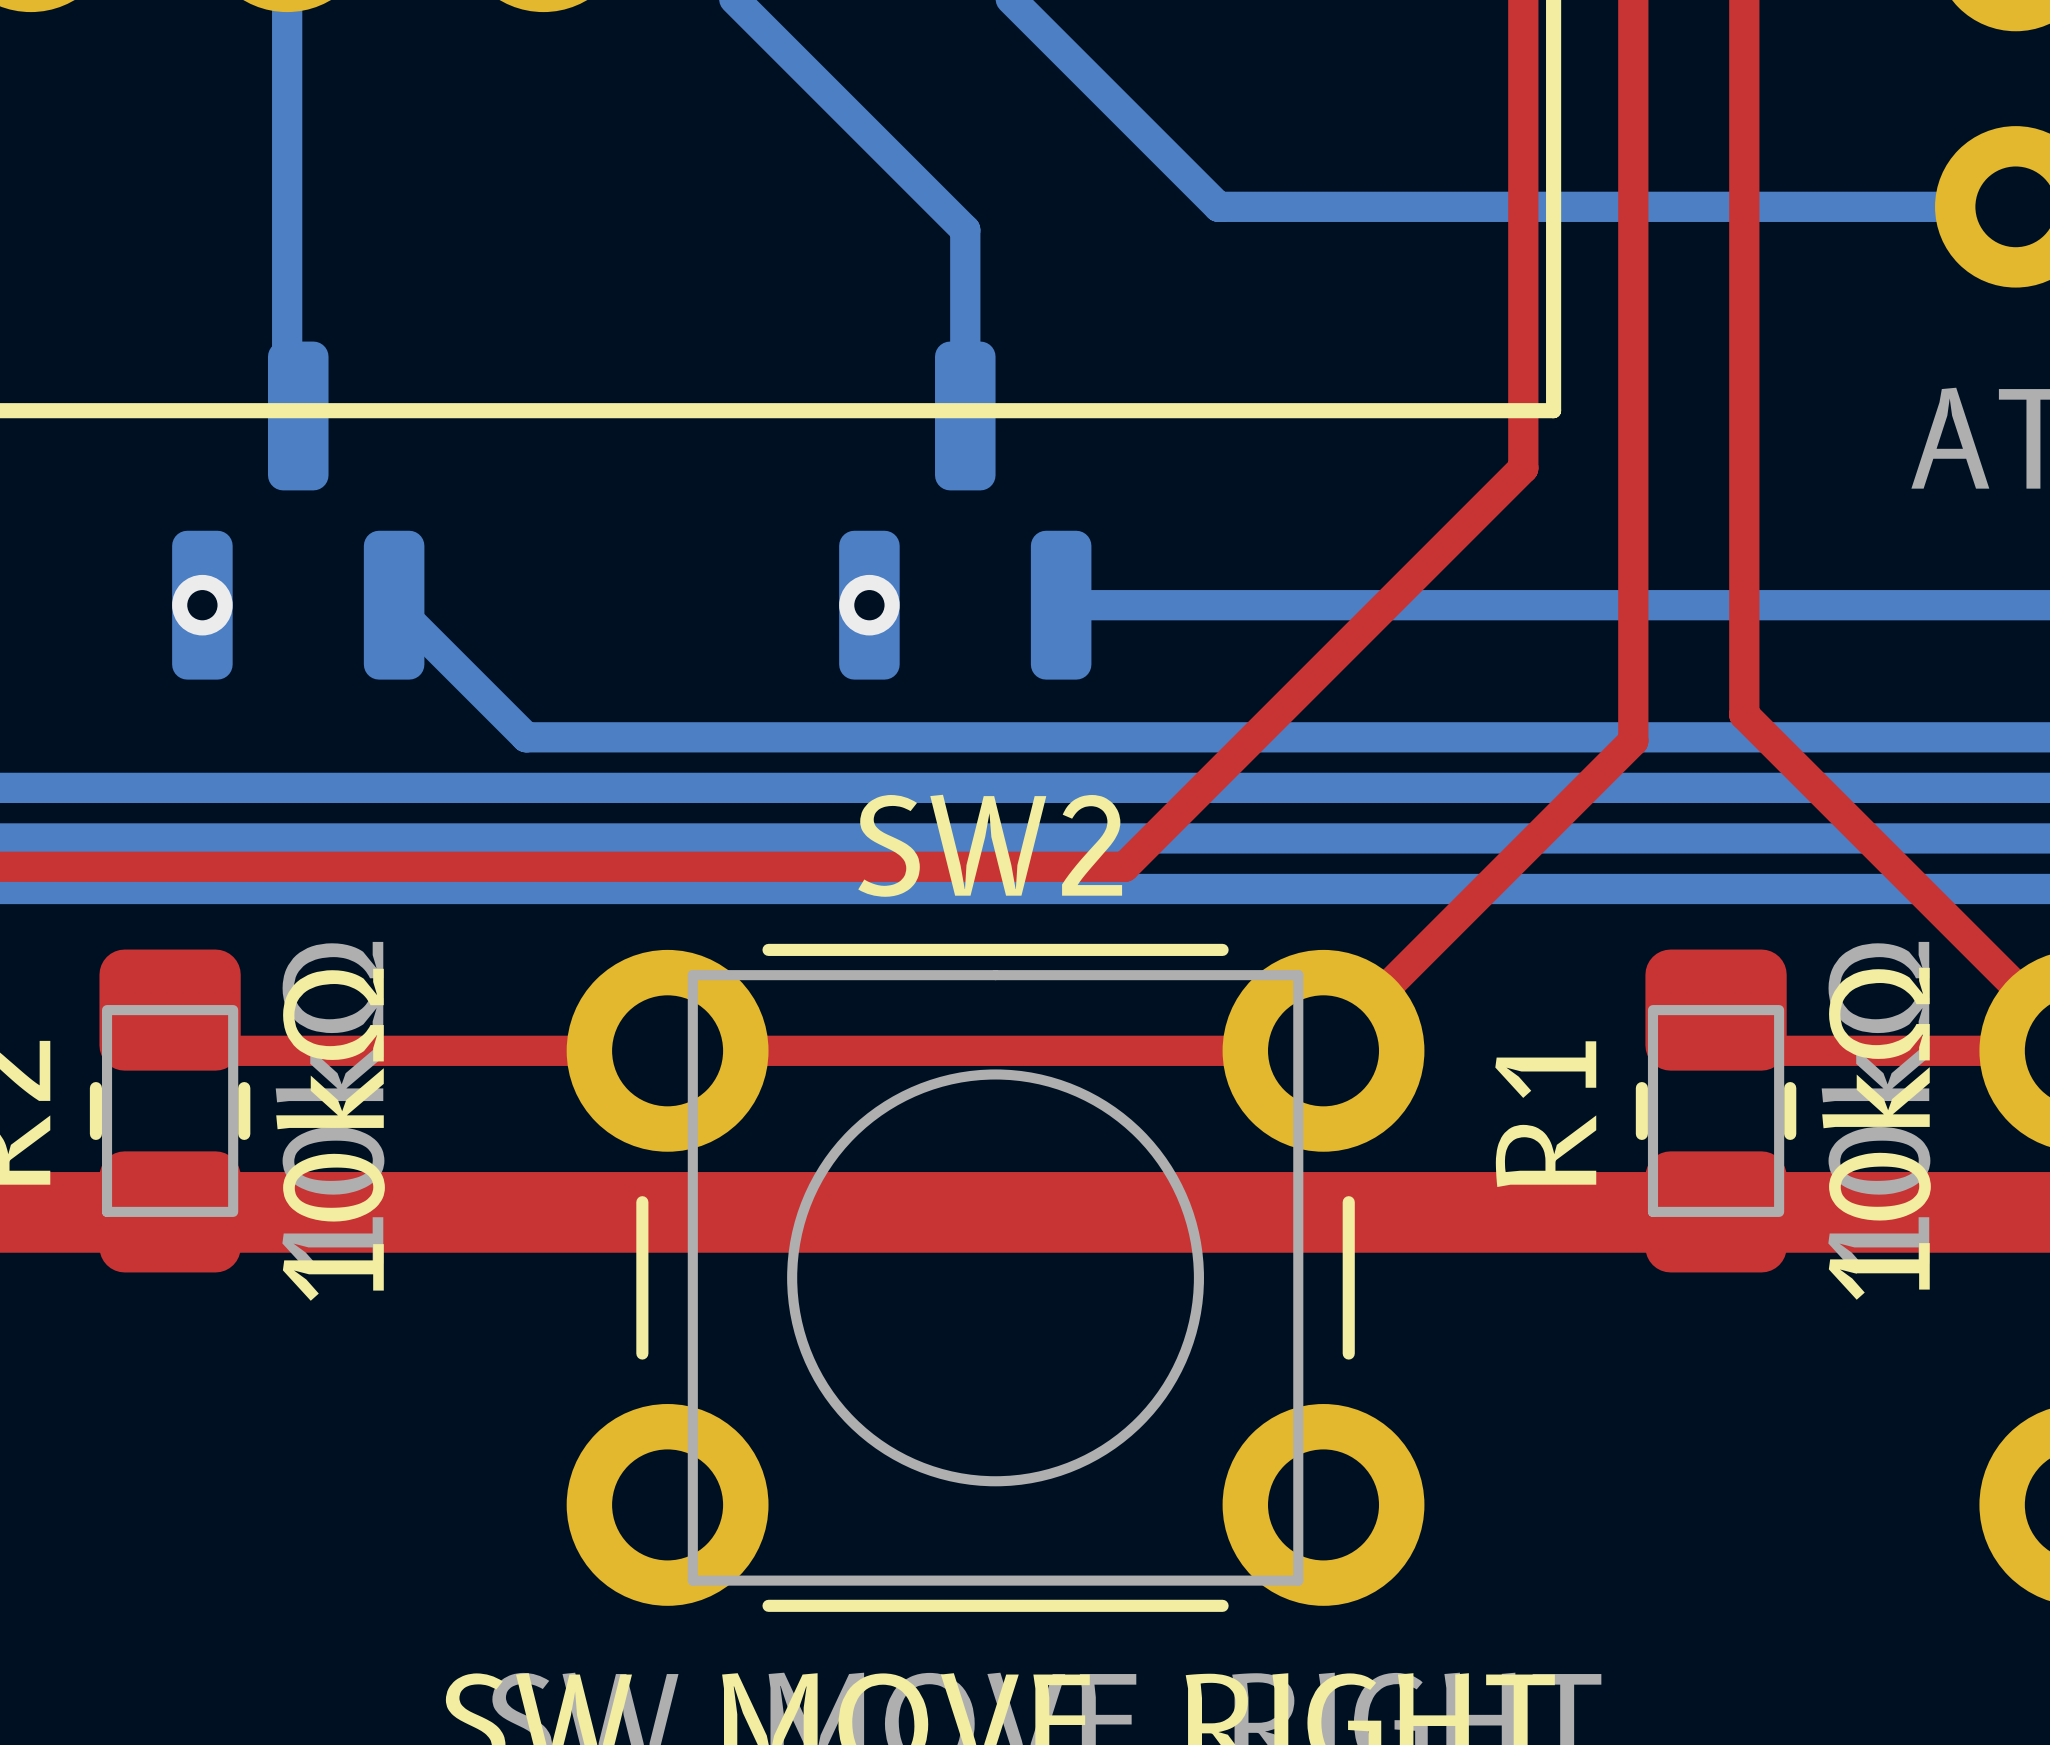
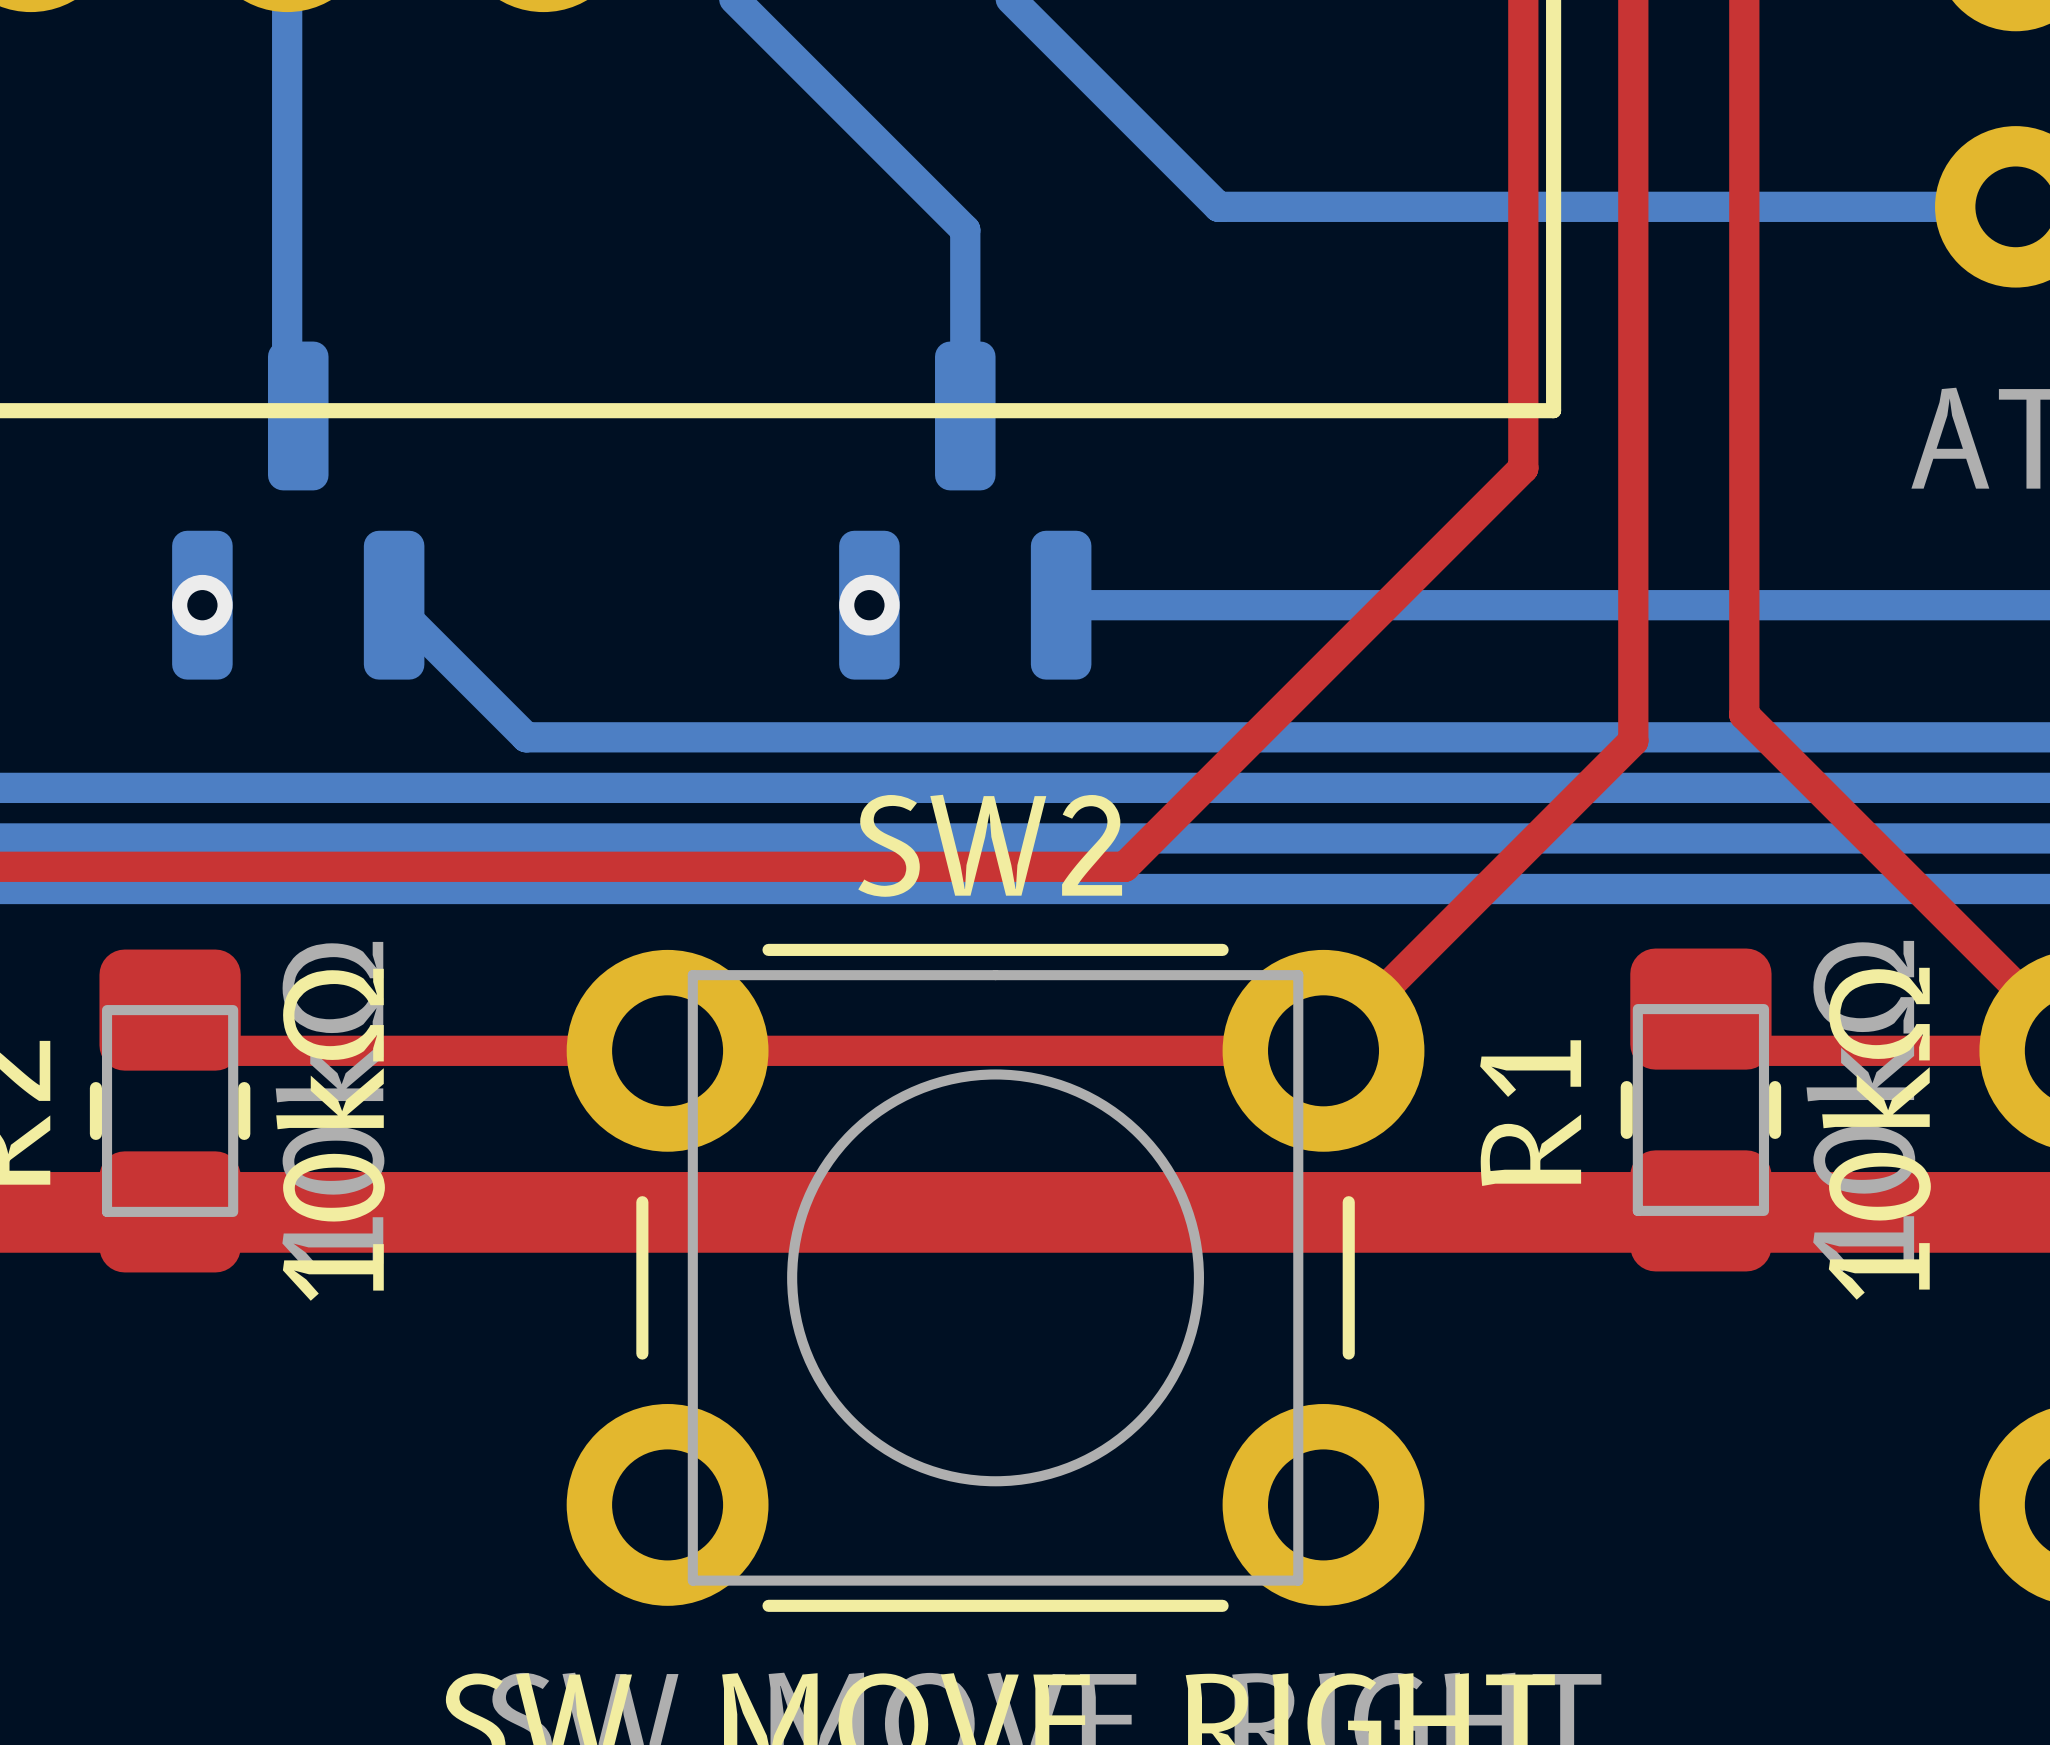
R1 position: (1716, 1110) -> (1700, 1109)

